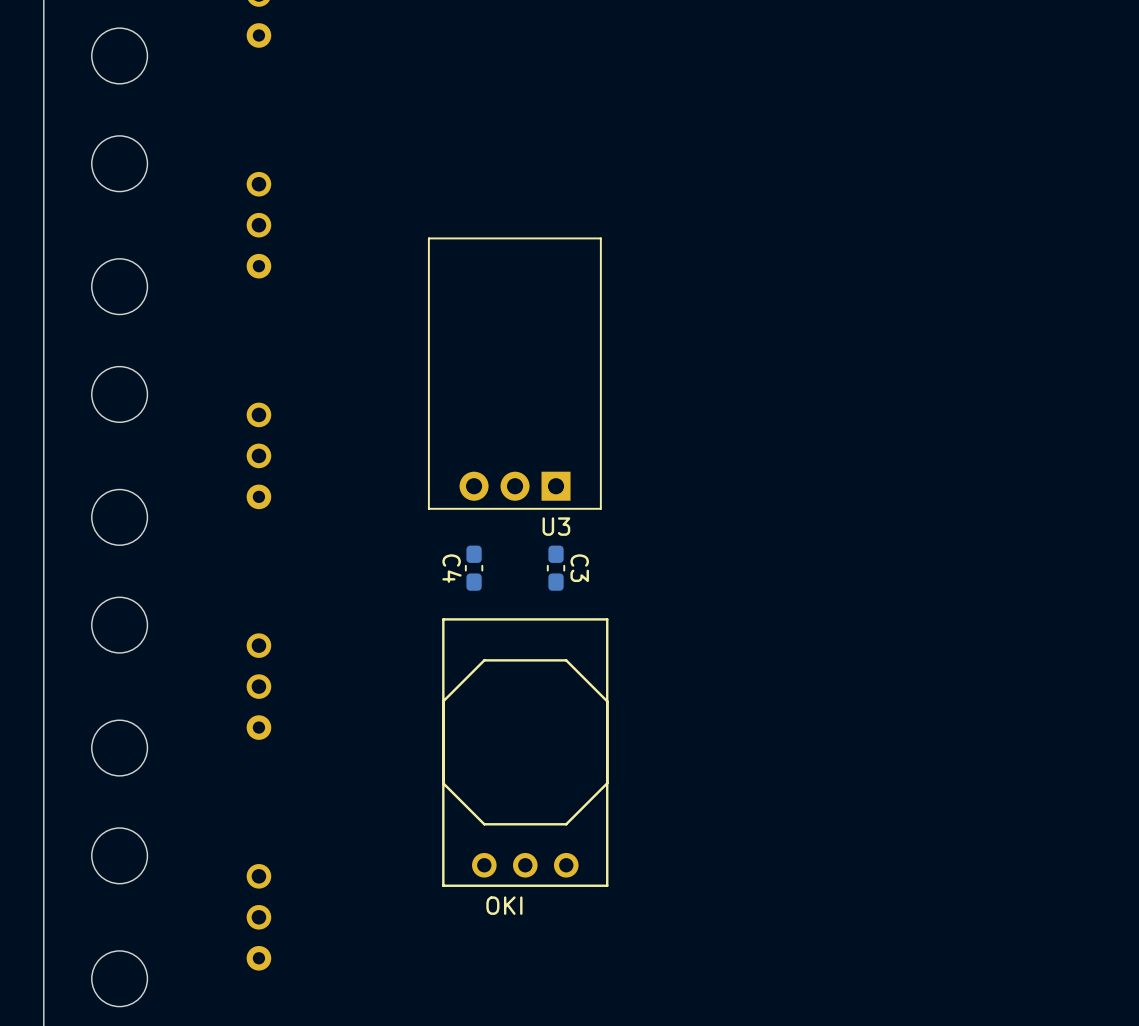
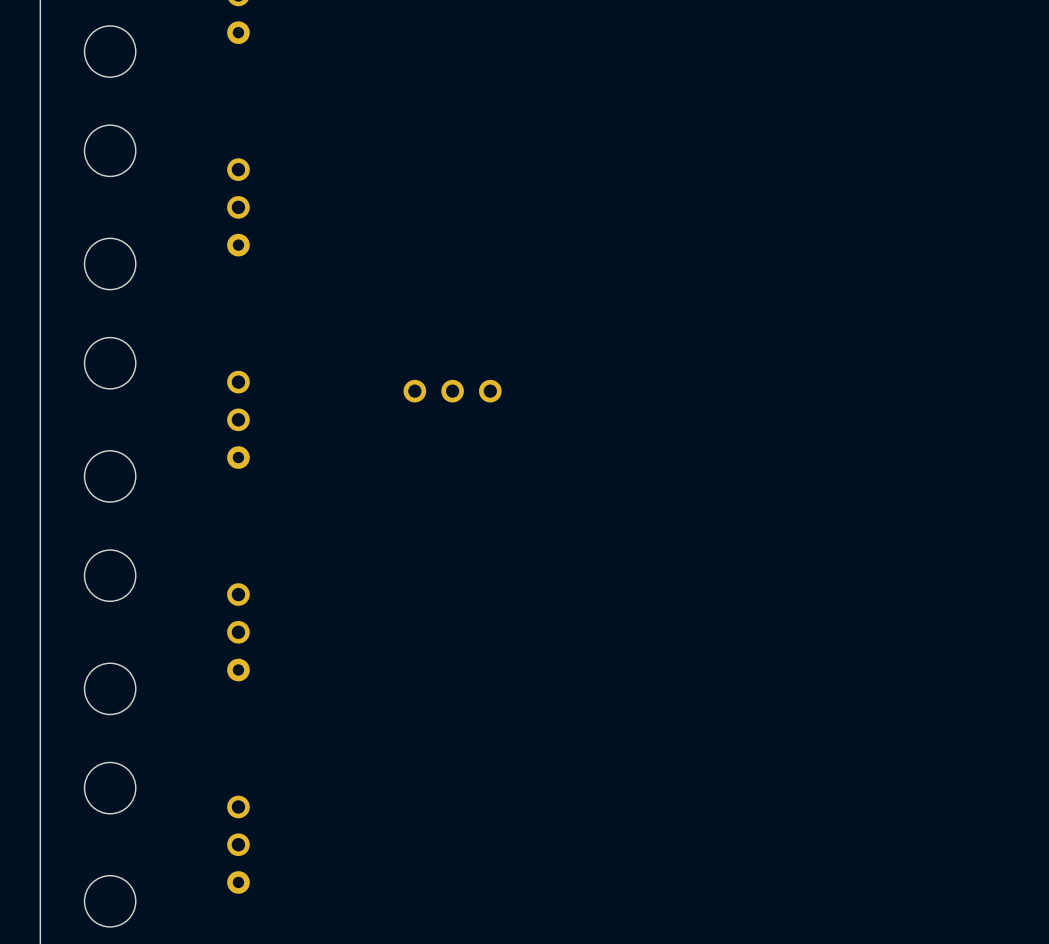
U3: (514, 373) -> none
C4: (474, 568) -> none
C3: (556, 568) -> none
part side: bottom (525, 752) -> top (452, 391)

